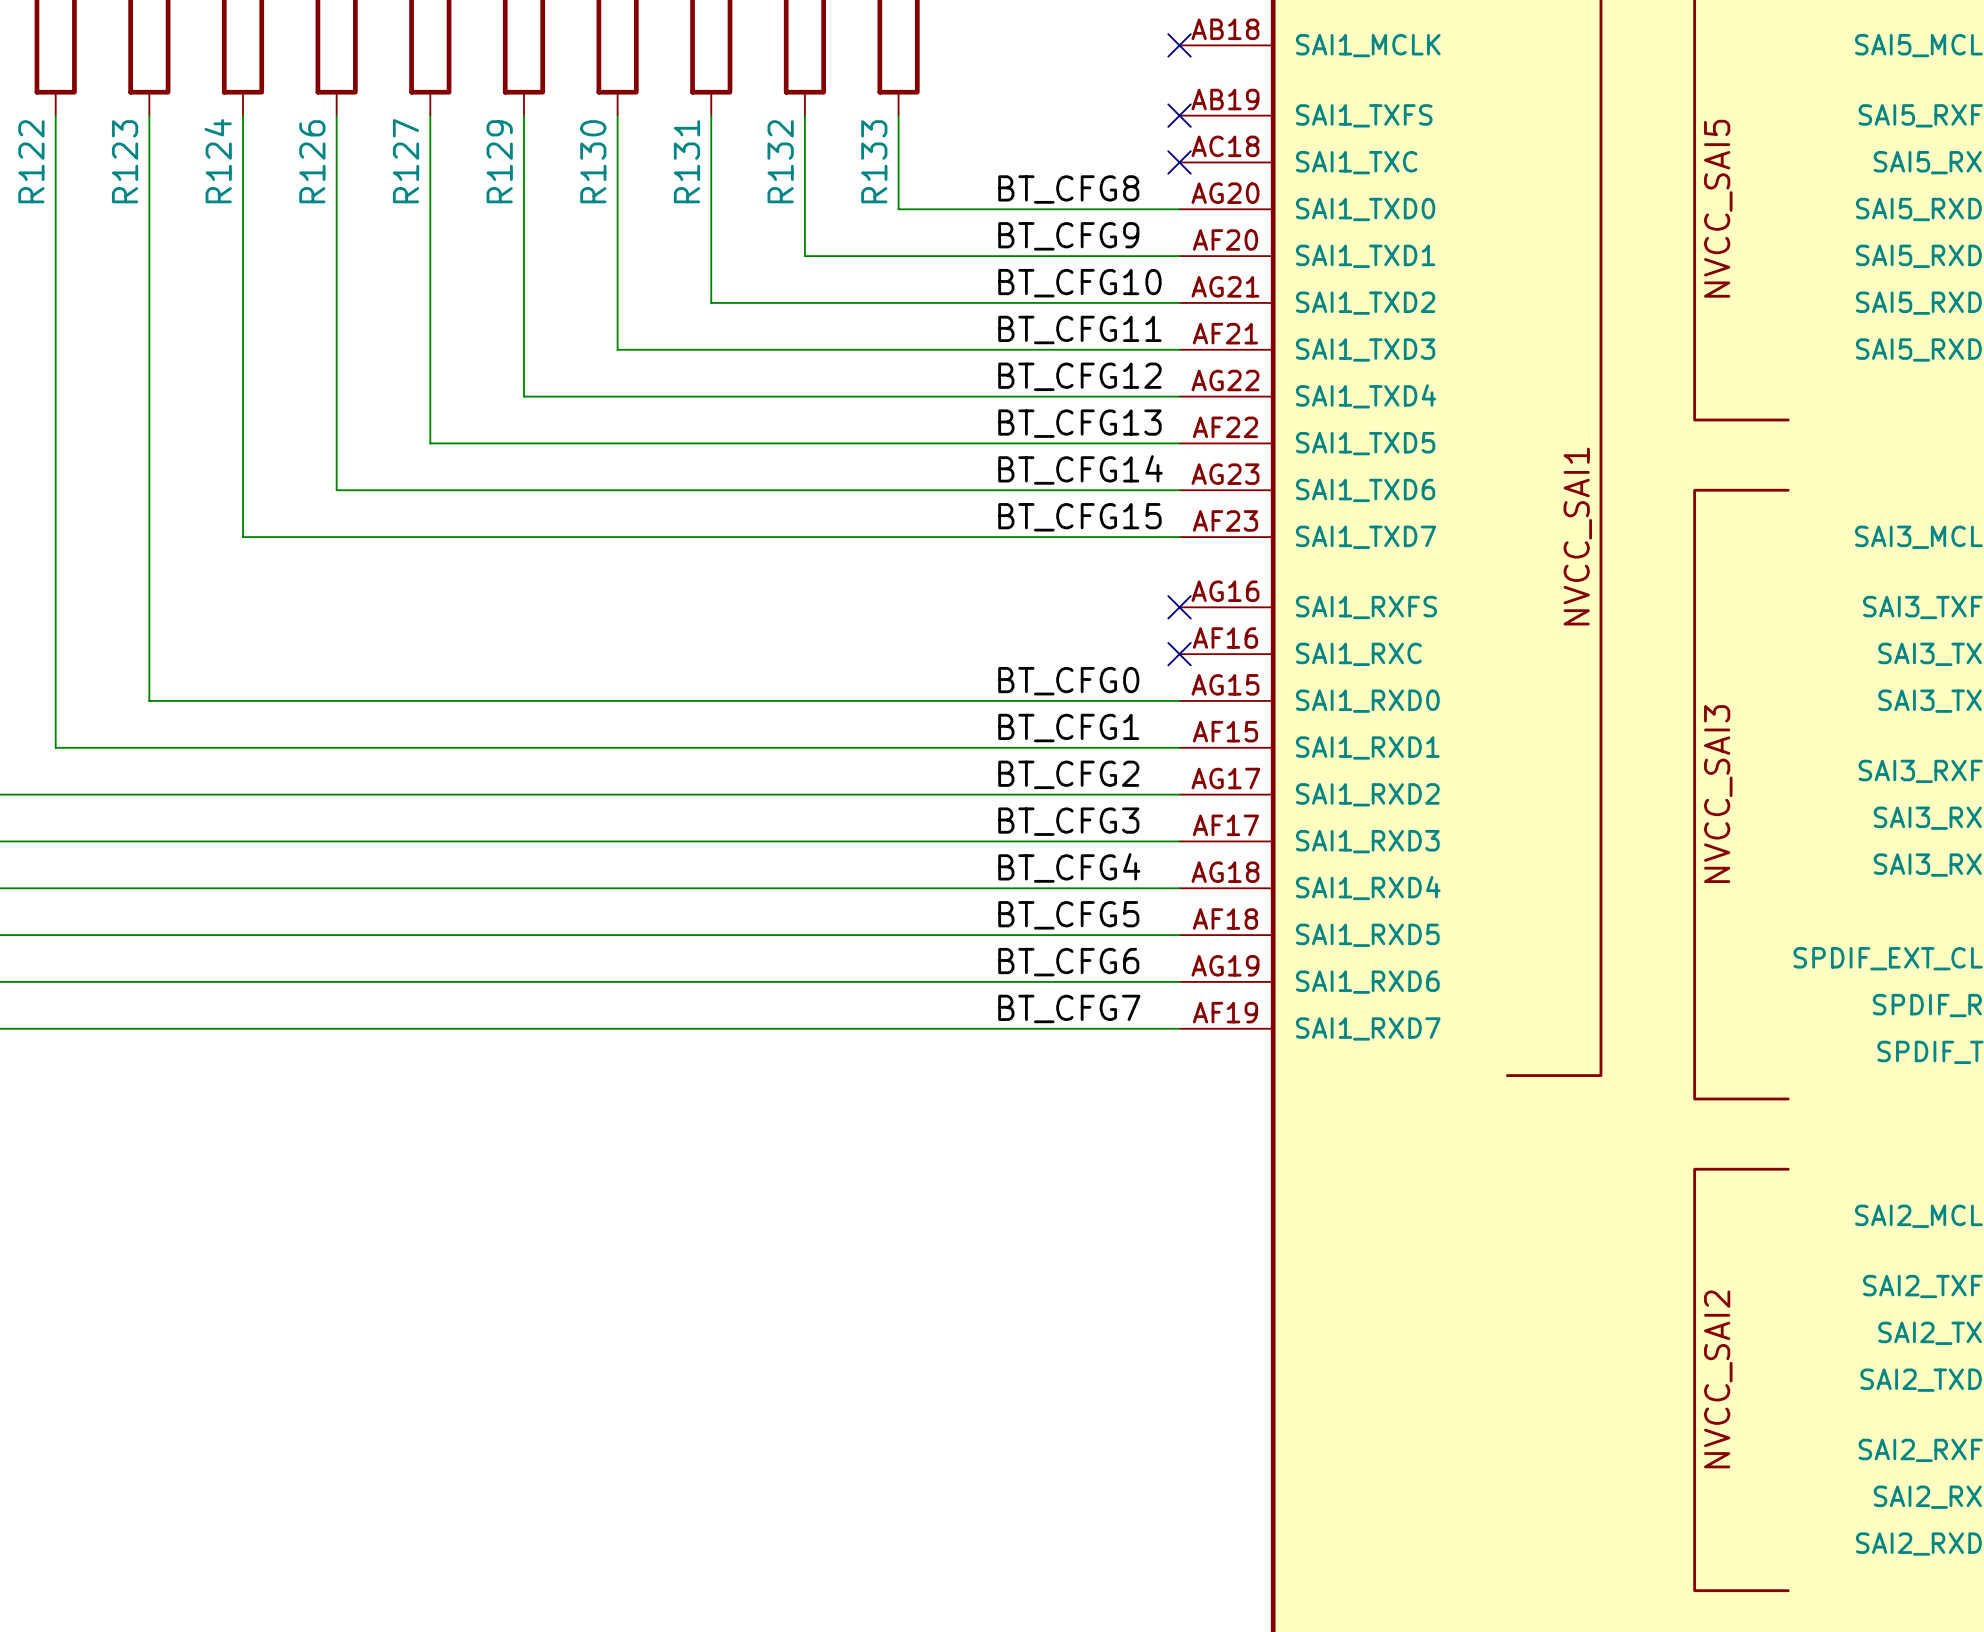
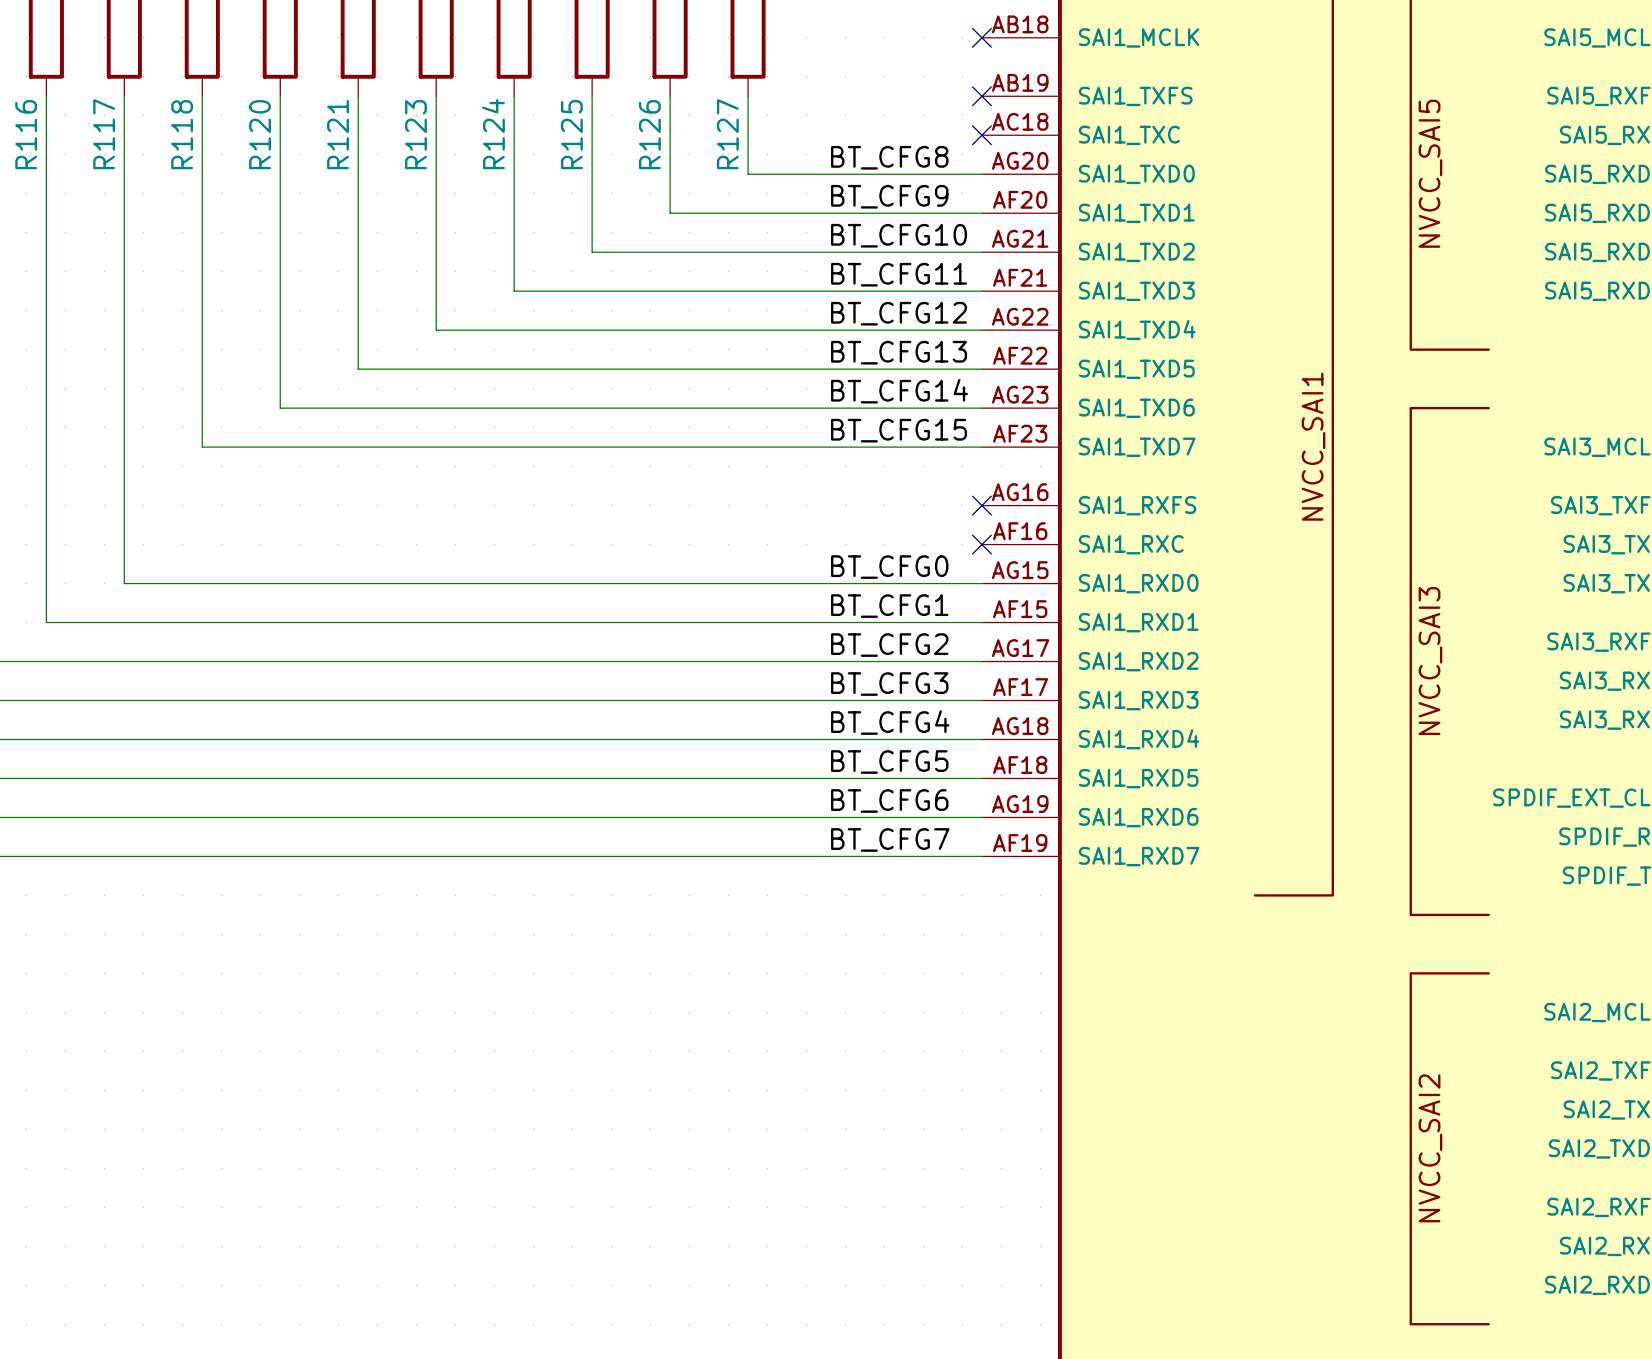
R122 name: R122 (31, 161) -> R116 (26, 134)
R123 name: R123 (125, 161) -> R117 (104, 134)
R124 name: R124 (218, 161) -> R118 (182, 134)
R126 name: R126 (312, 161) -> R120 (260, 134)
R127 name: R127 (406, 161) -> R121 (338, 134)
R129 name: R129 (499, 161) -> R123 (415, 134)
R130 name: R130 (593, 161) -> R124 (493, 134)
R131 name: R131 (686, 161) -> R125 (571, 134)
R132 name: R132 (780, 161) -> R126 (649, 134)
R133 name: R133 (874, 161) -> R127 (727, 134)

